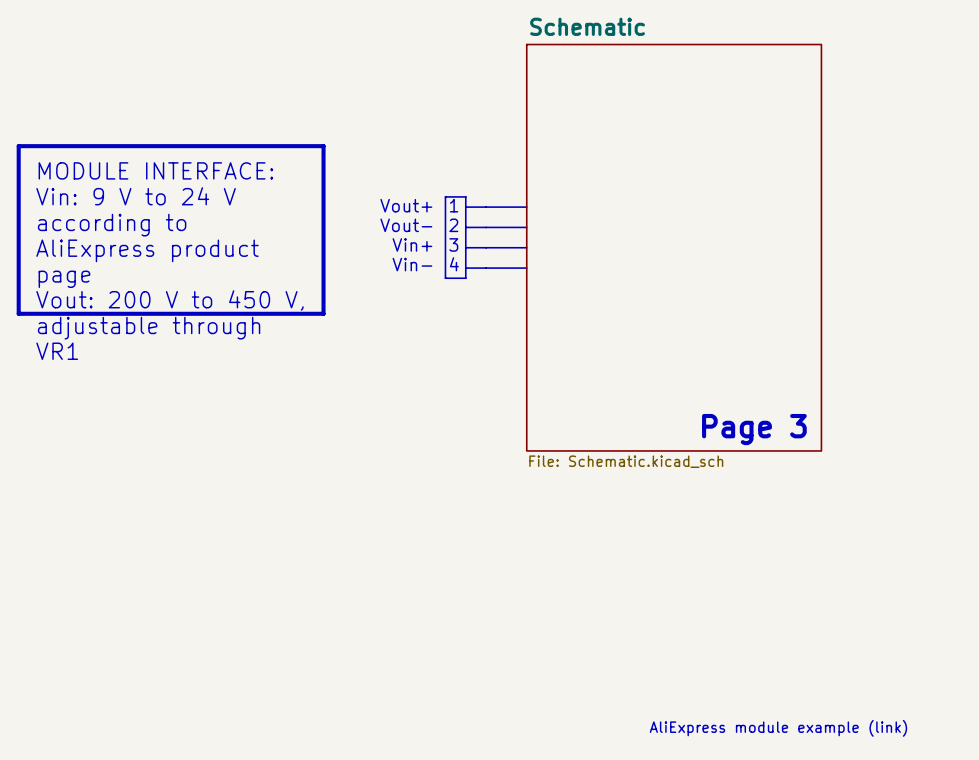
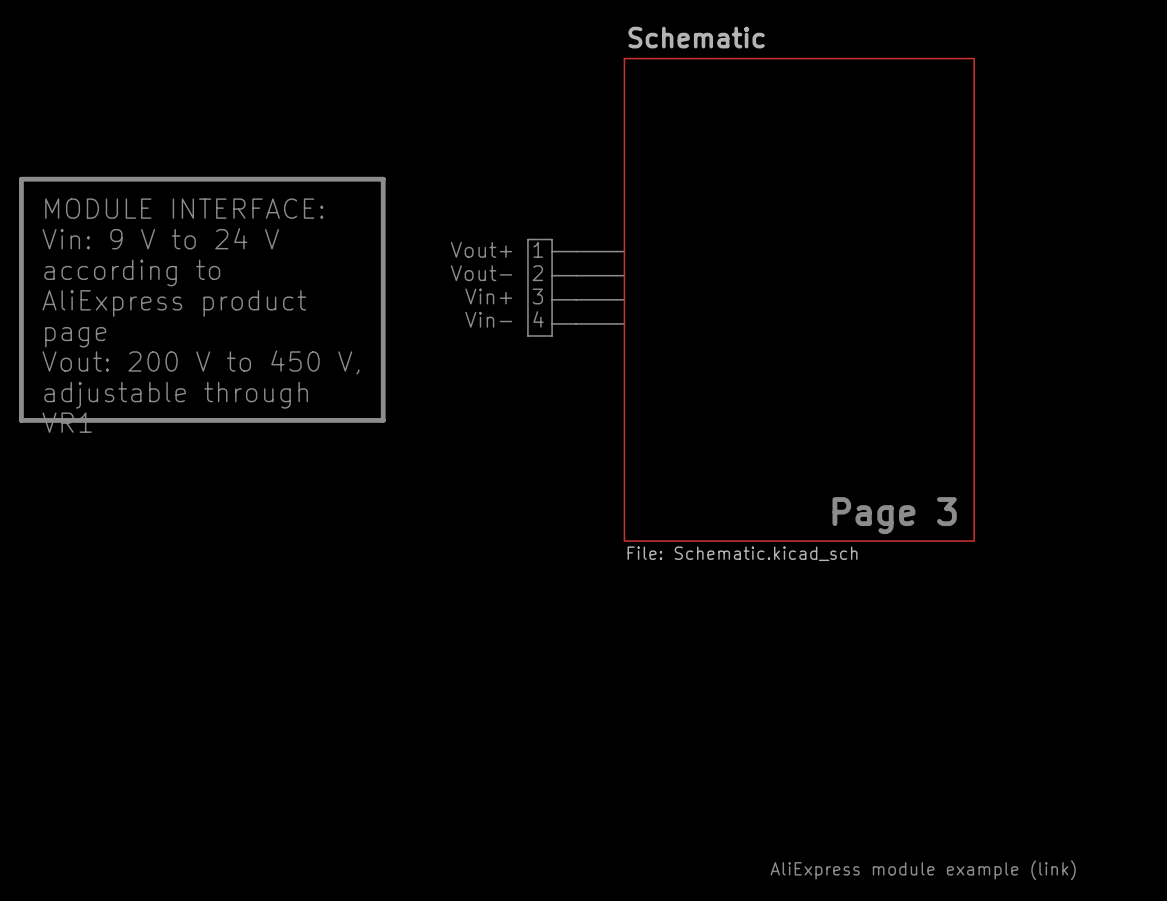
line: (18, 313) (323, 313) -> (21, 378) (21, 420) (383, 420) (383, 378)

